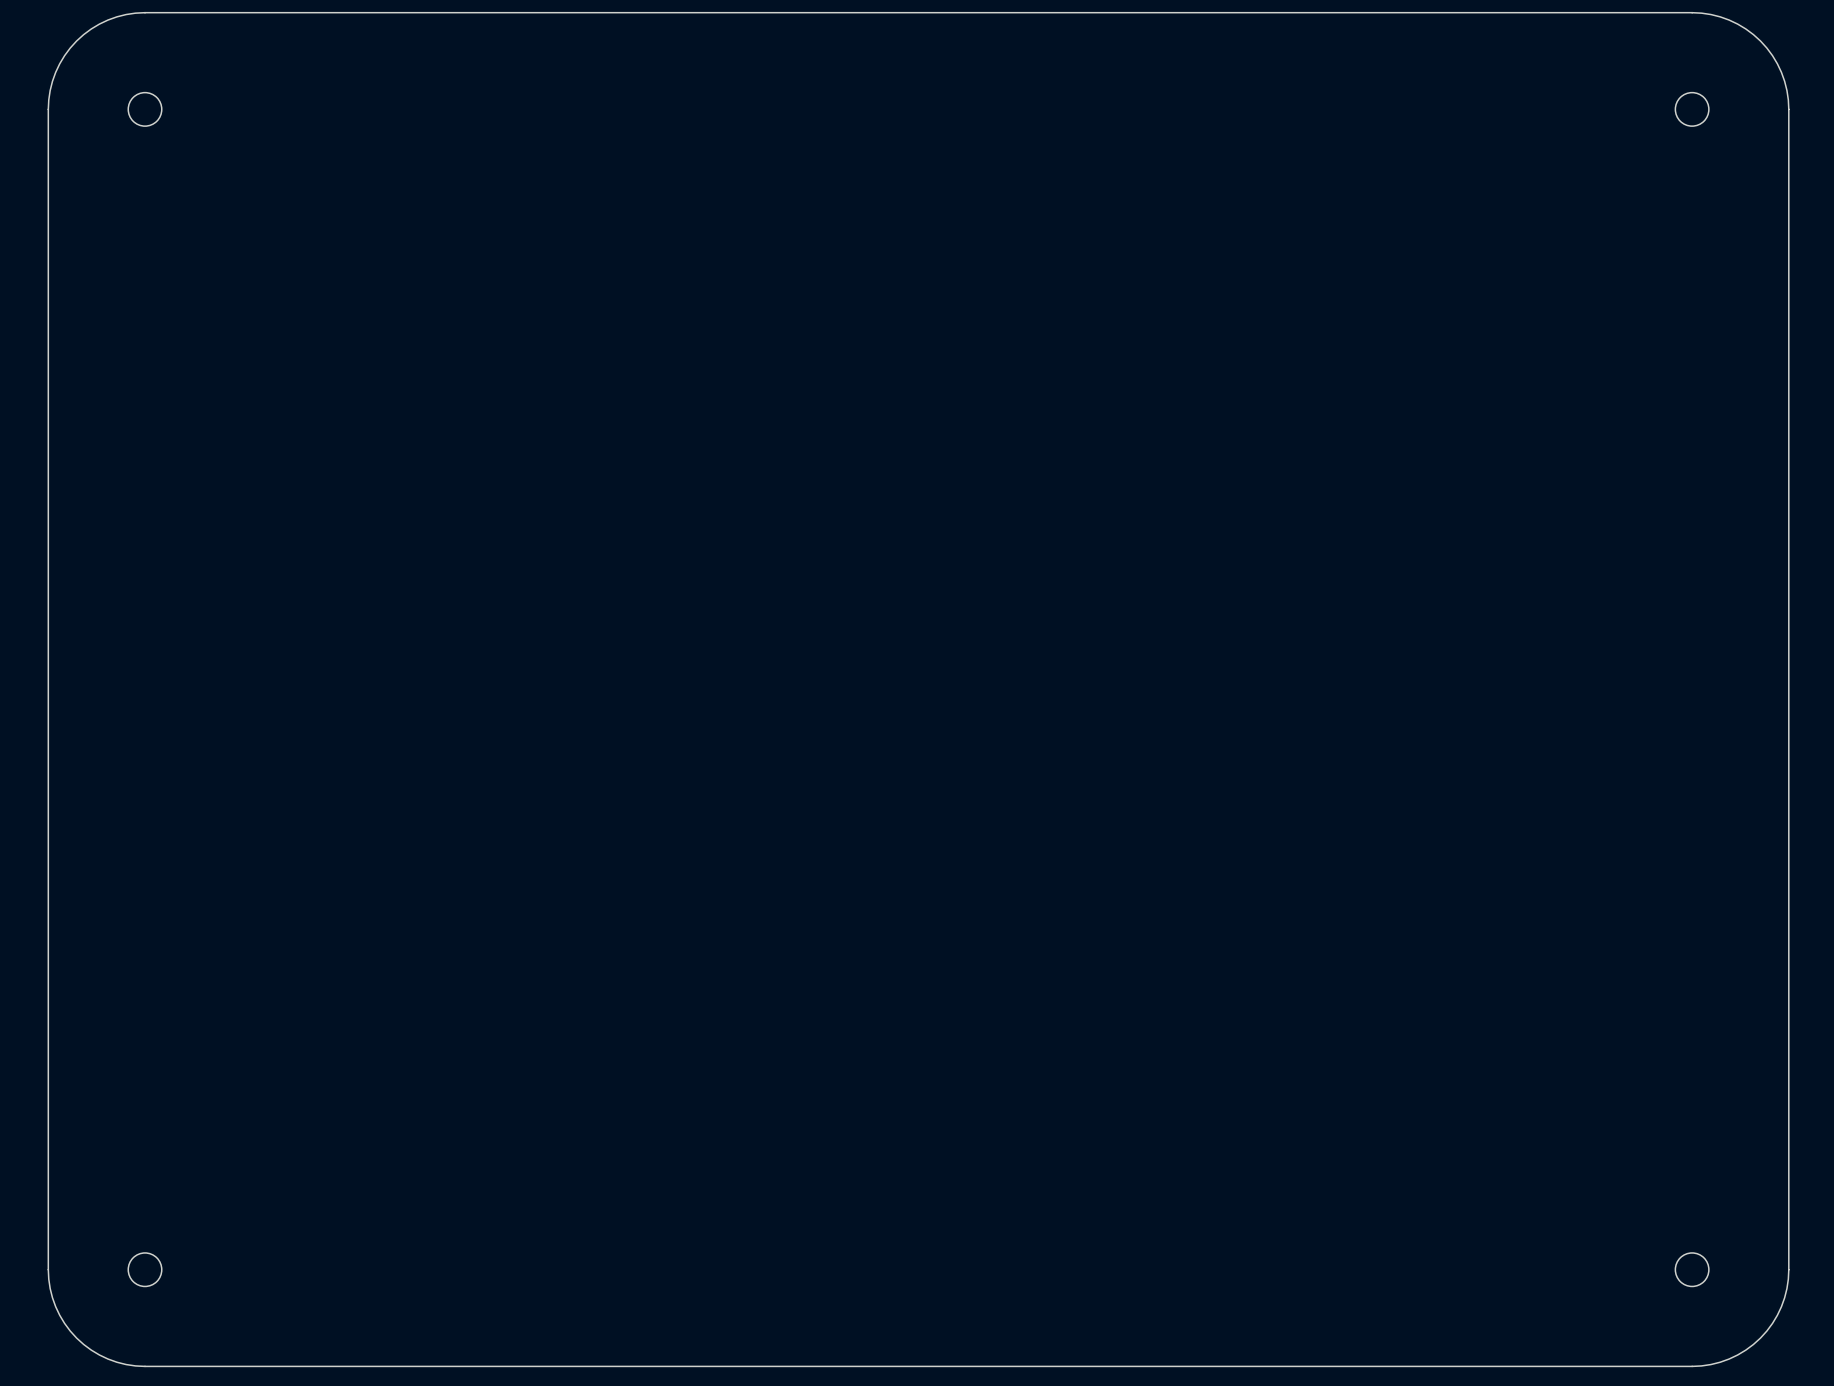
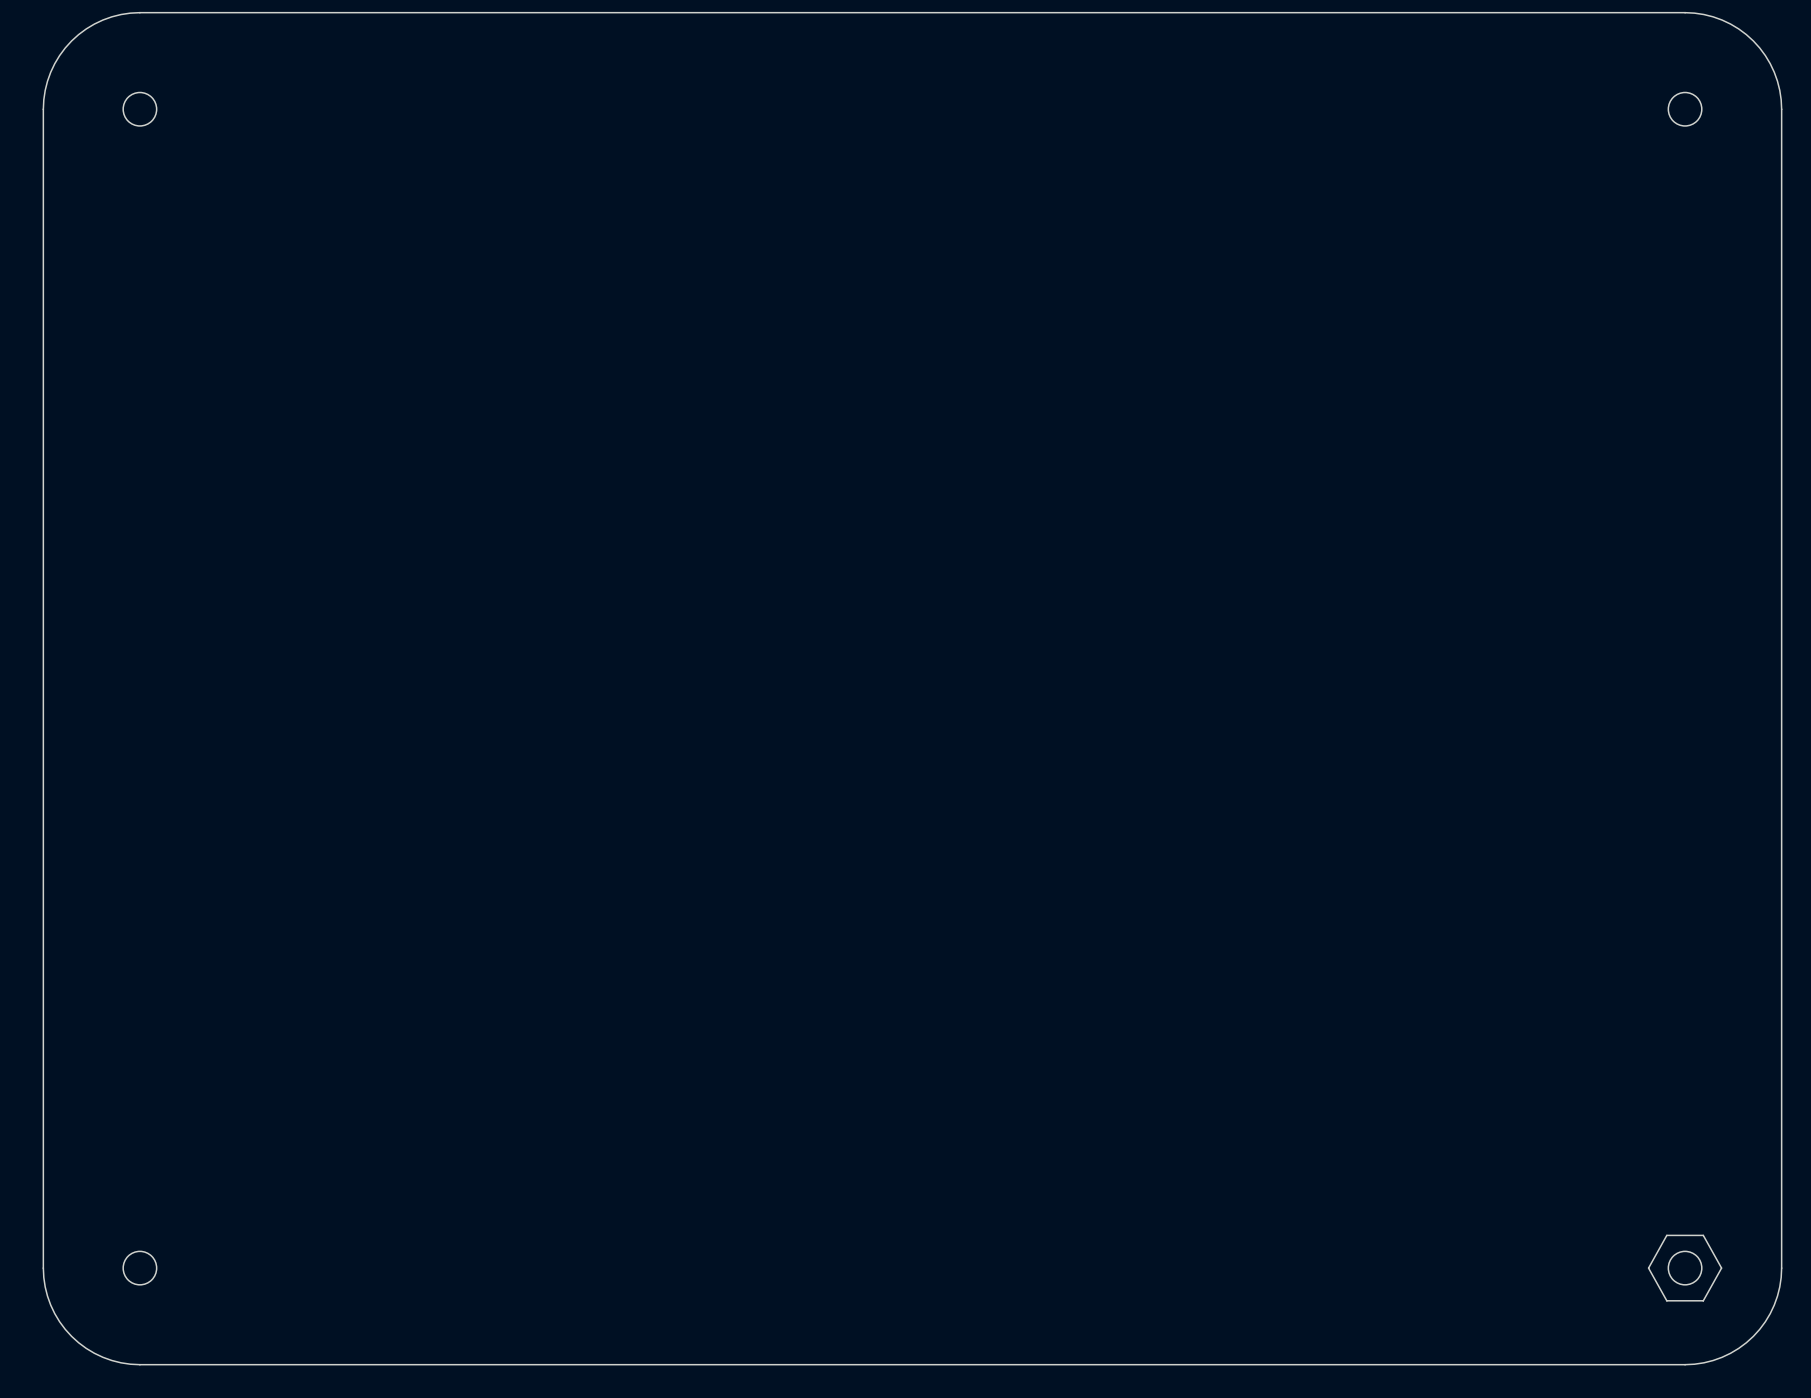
drawing: none -> [1647, 1234, 1723, 1302]

